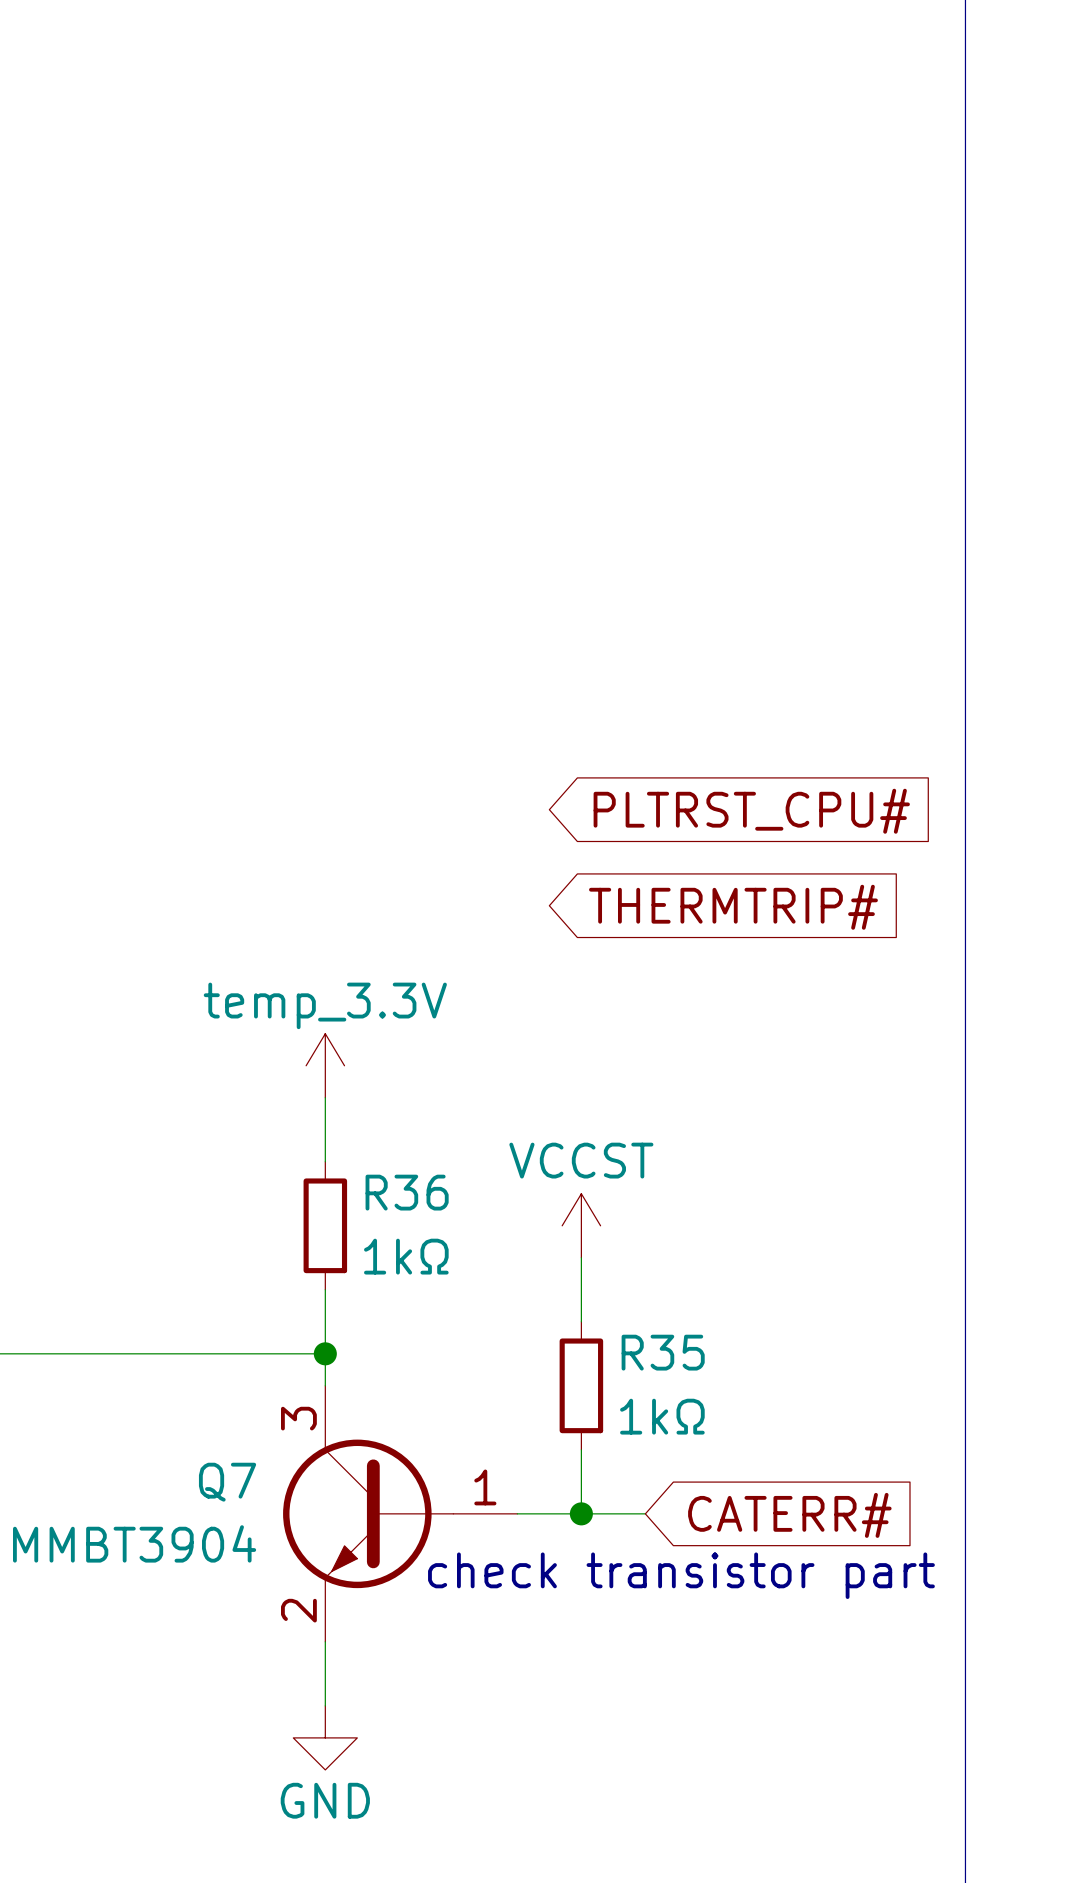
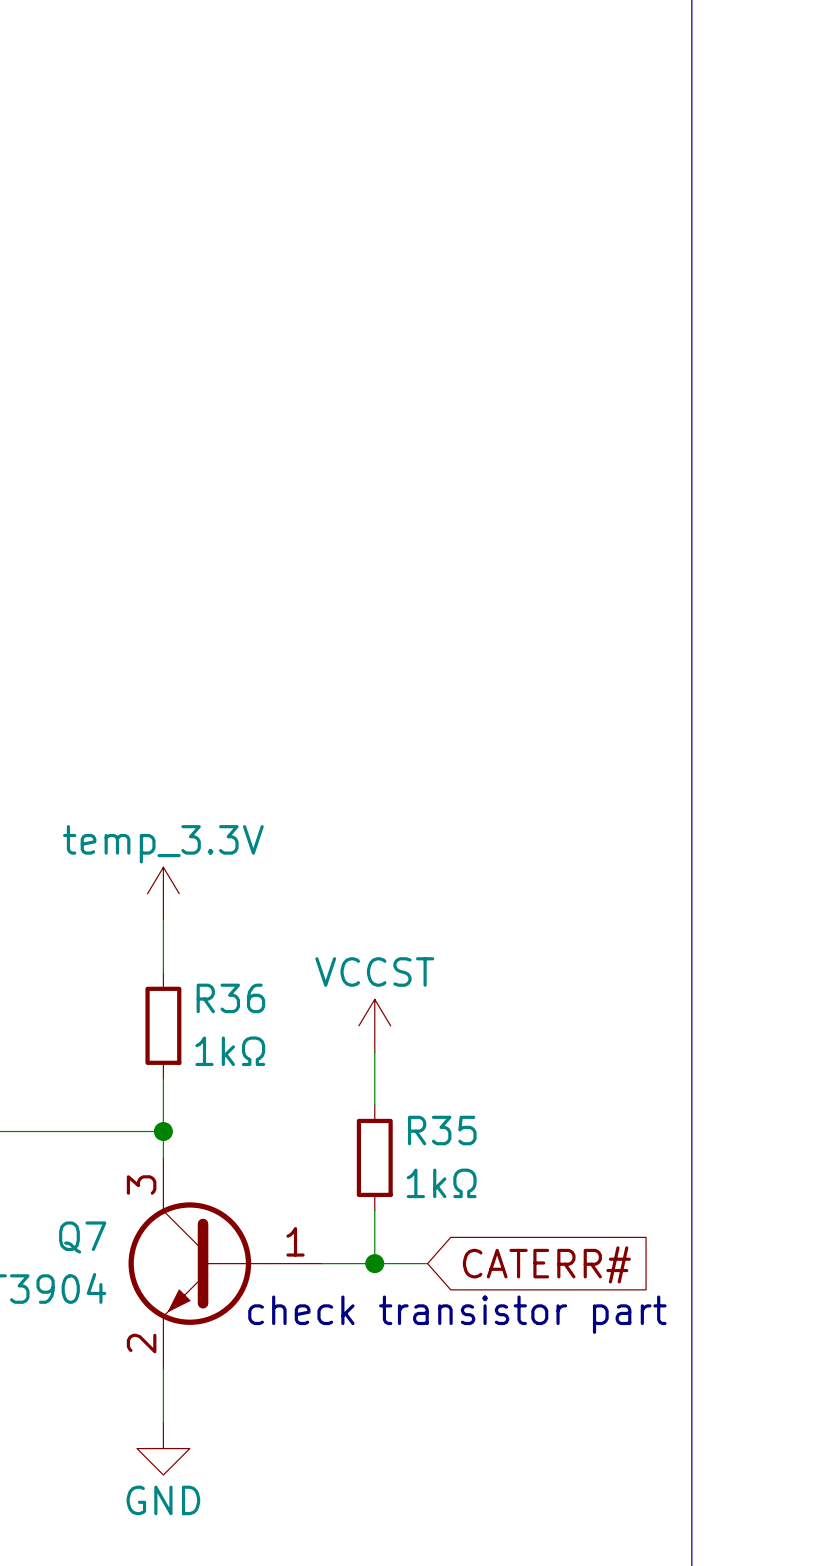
global label: PLTRST_CPU# (751, 811) -> none
global label: THERMTRIP# (733, 907) -> none

